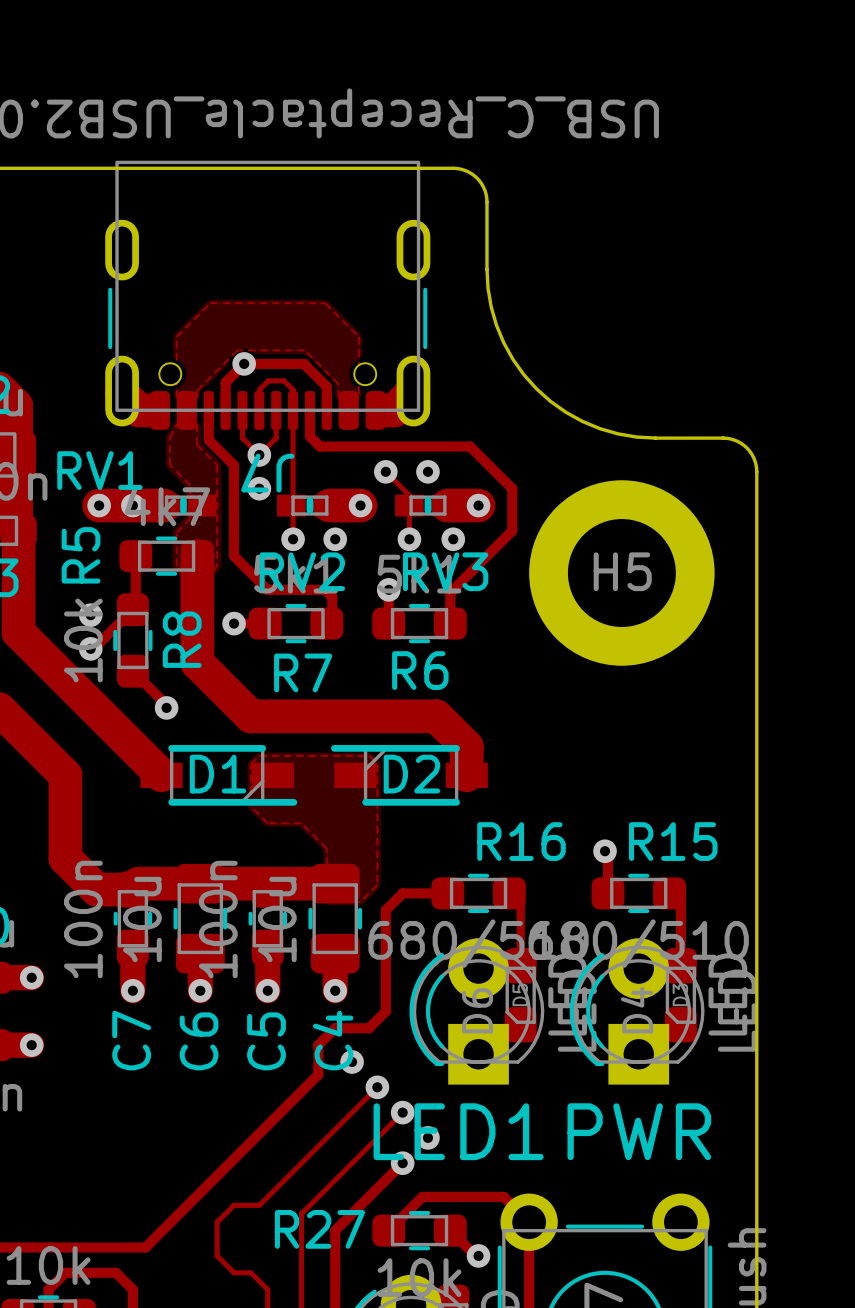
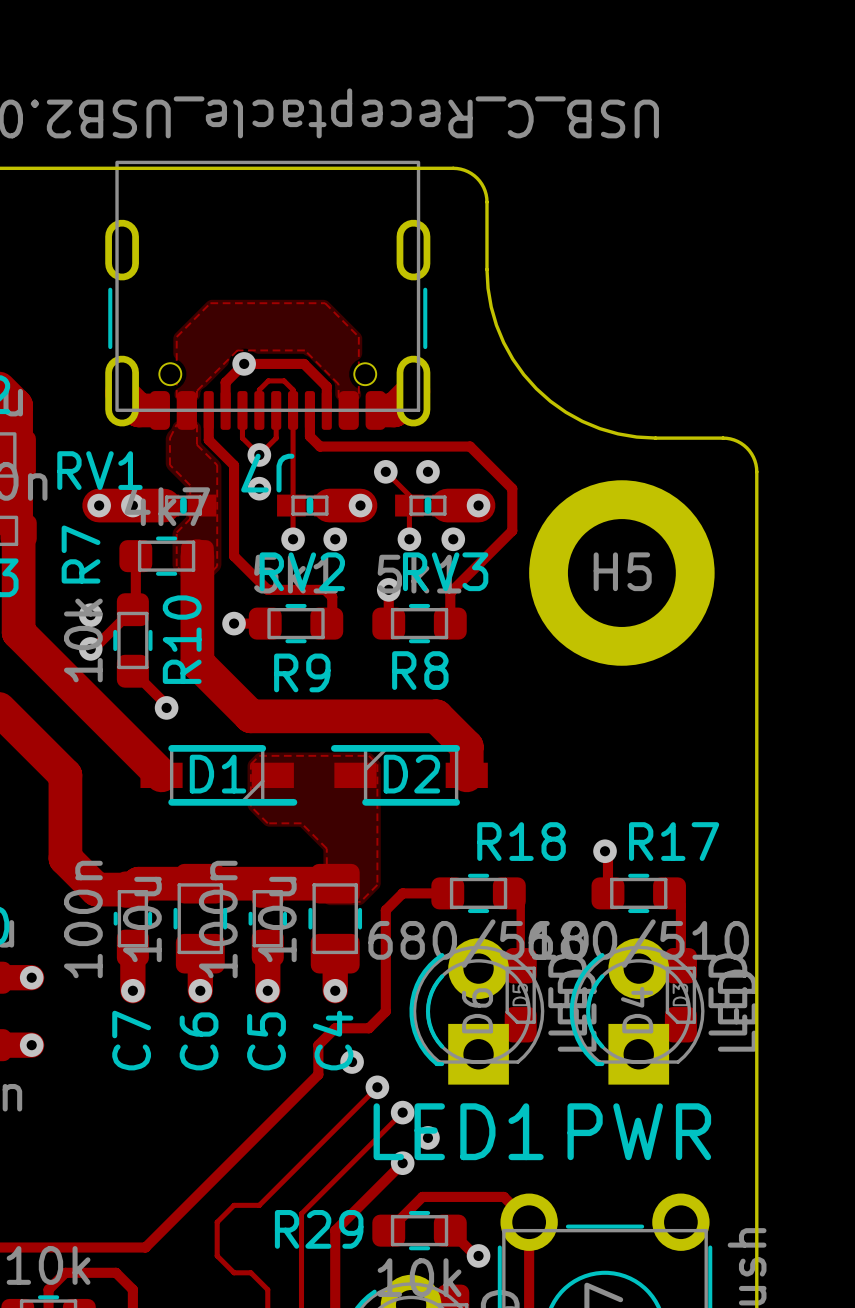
R5 name: R5 (81, 555) -> R7 (81, 554)
R8 name: R8 (182, 639) -> R10 (182, 639)
R6 name: R6 (420, 670) -> R8 (420, 670)
R7 name: R7 (303, 672) -> R9 (302, 672)
R16 name: R16 (521, 841) -> R18 (521, 841)
R15 name: R15 (673, 841) -> R17 (674, 841)
R27 name: R27 (319, 1229) -> R29 (319, 1229)

